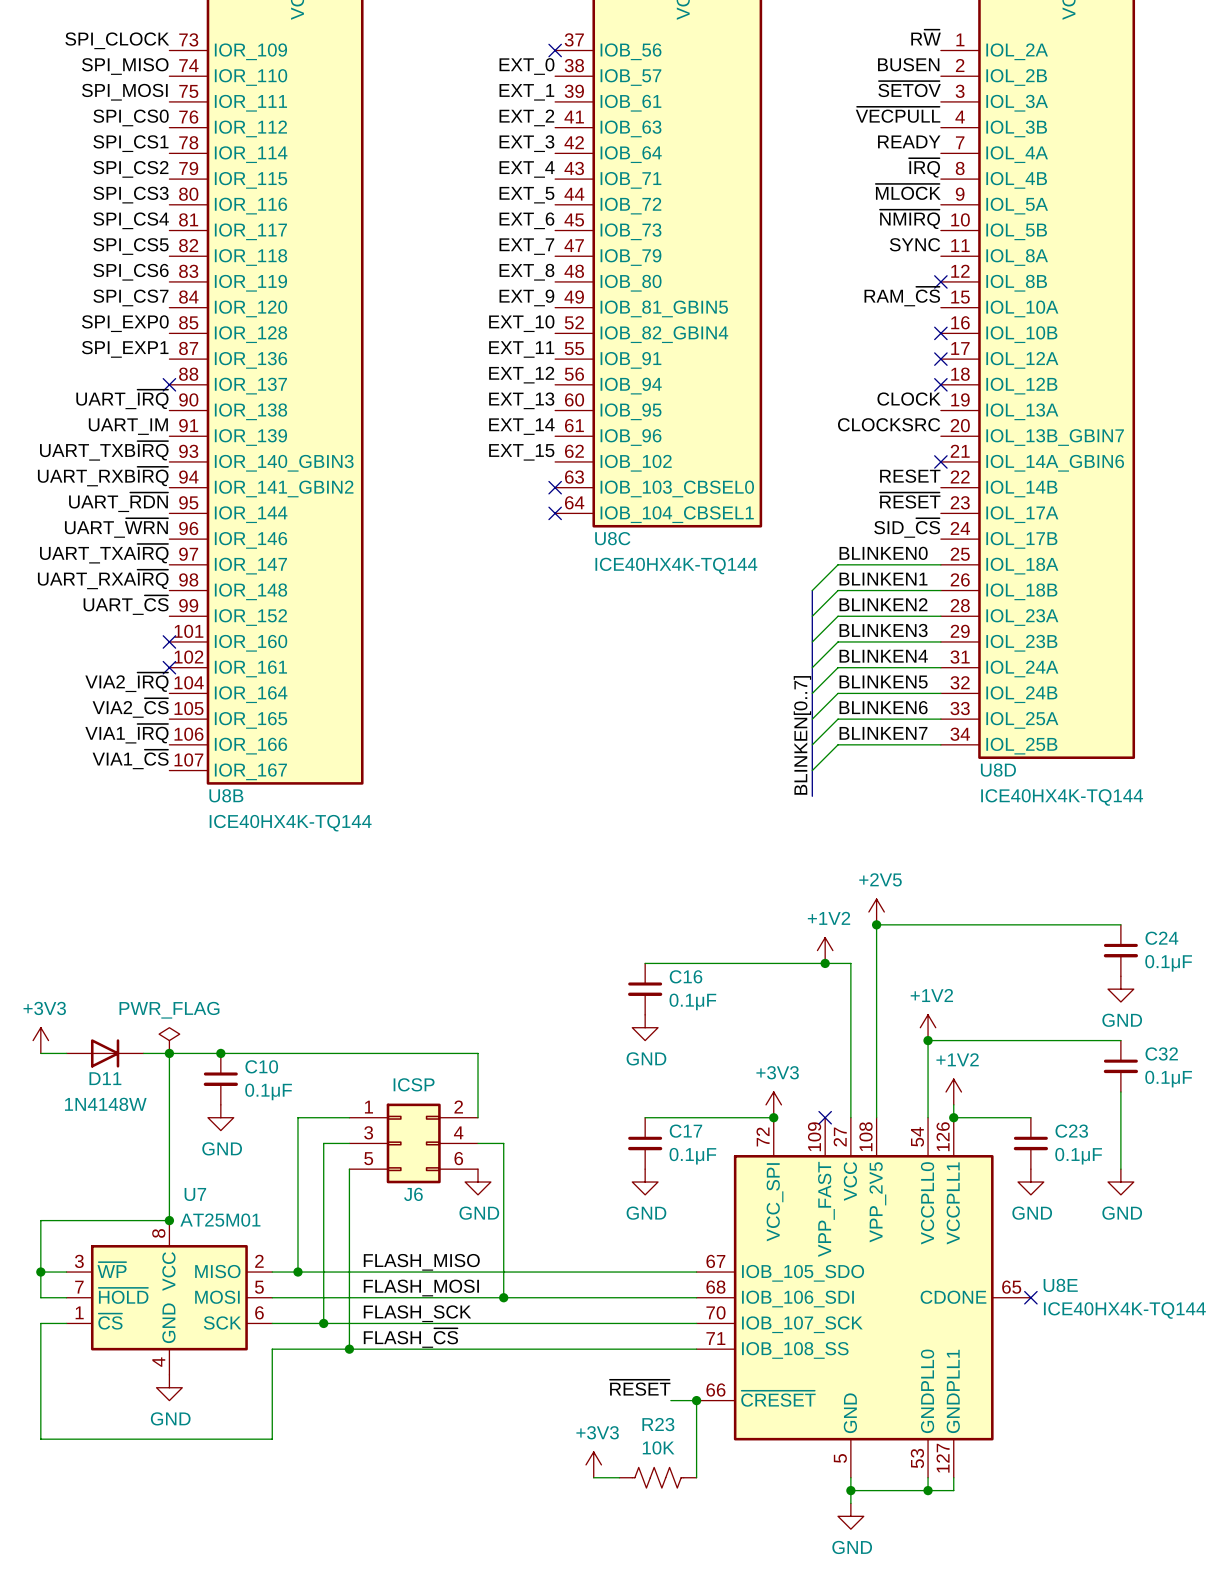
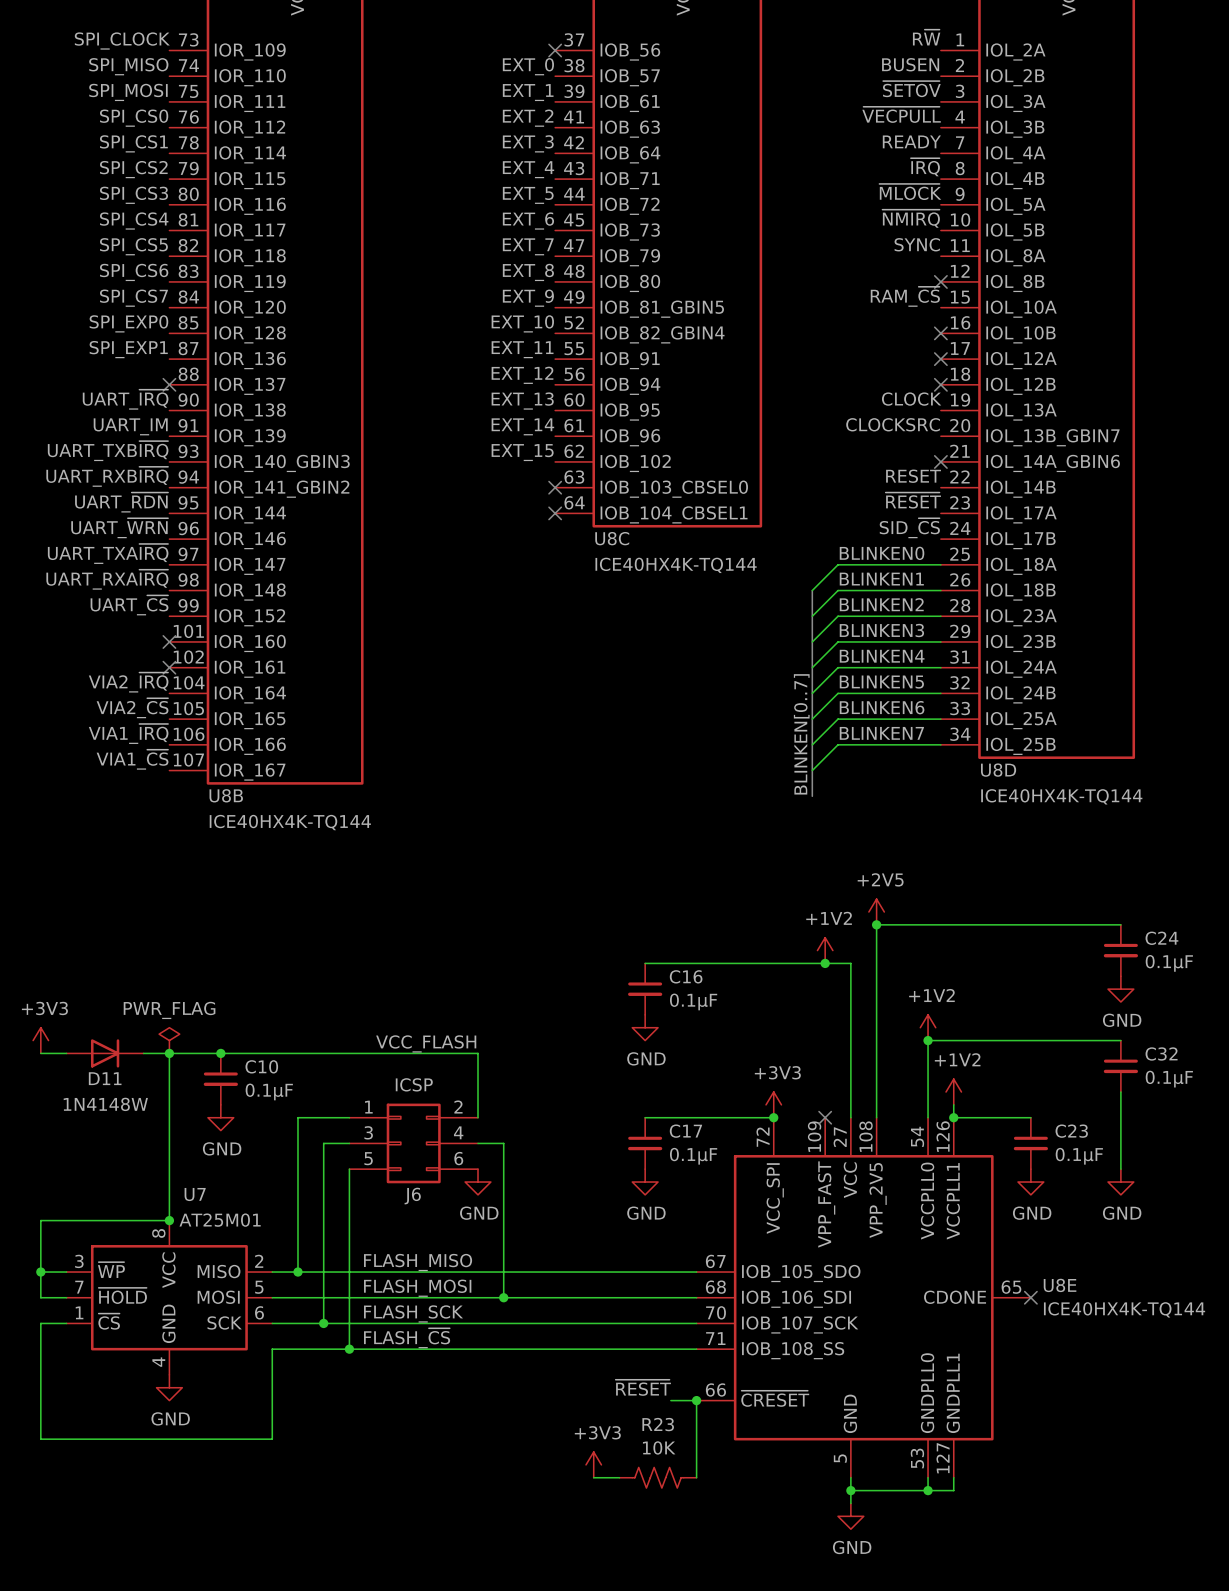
label: none -> VCC_FLASH (426, 1043)

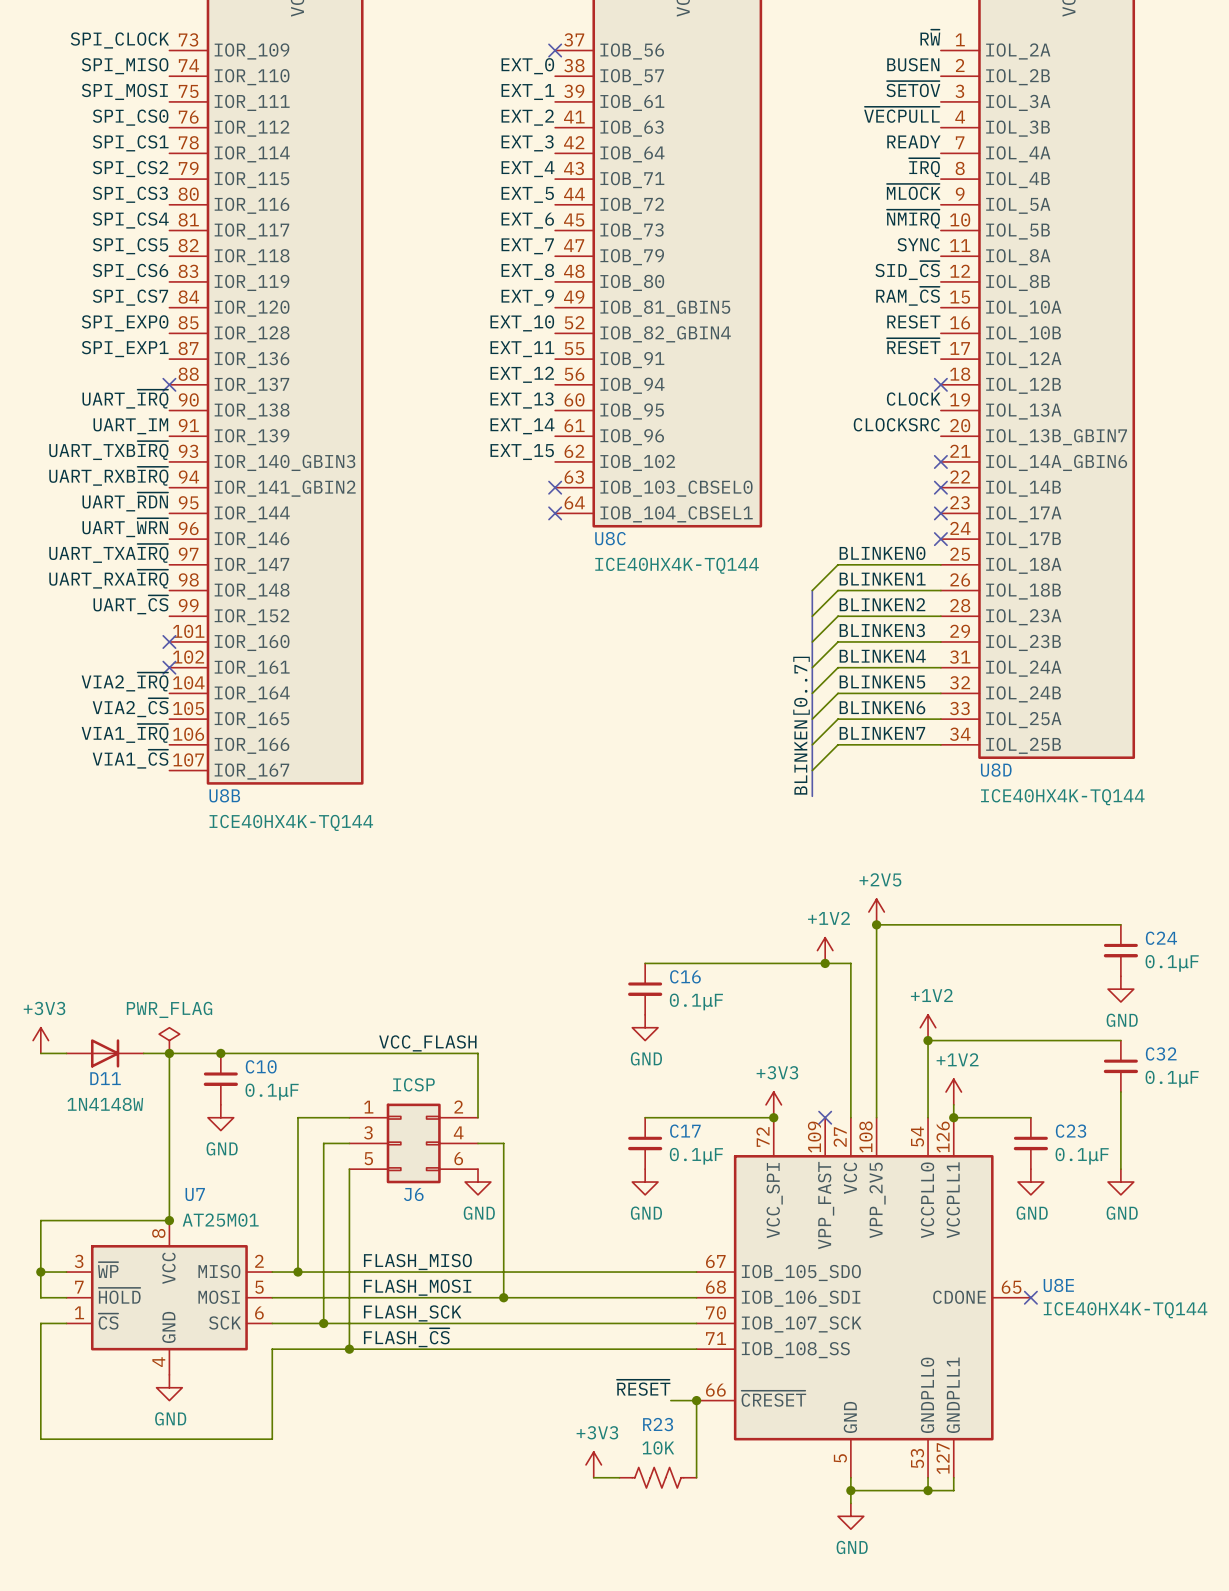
label: none -> SID_~{CS} (907, 270)
no-connect mark: (940, 281) -> none
no-connect mark: (940, 333) -> none
no-connect mark: (940, 359) -> none
label position: RESET (913, 476) -> RESET (913, 321)
no-connect mark: none -> (940, 487)
label position: ~{RESET} (913, 500) -> ~{RESET} (913, 346)
no-connect mark: none -> (940, 513)
label: SID_~{CS} (909, 528) -> none
no-connect mark: none -> (940, 539)

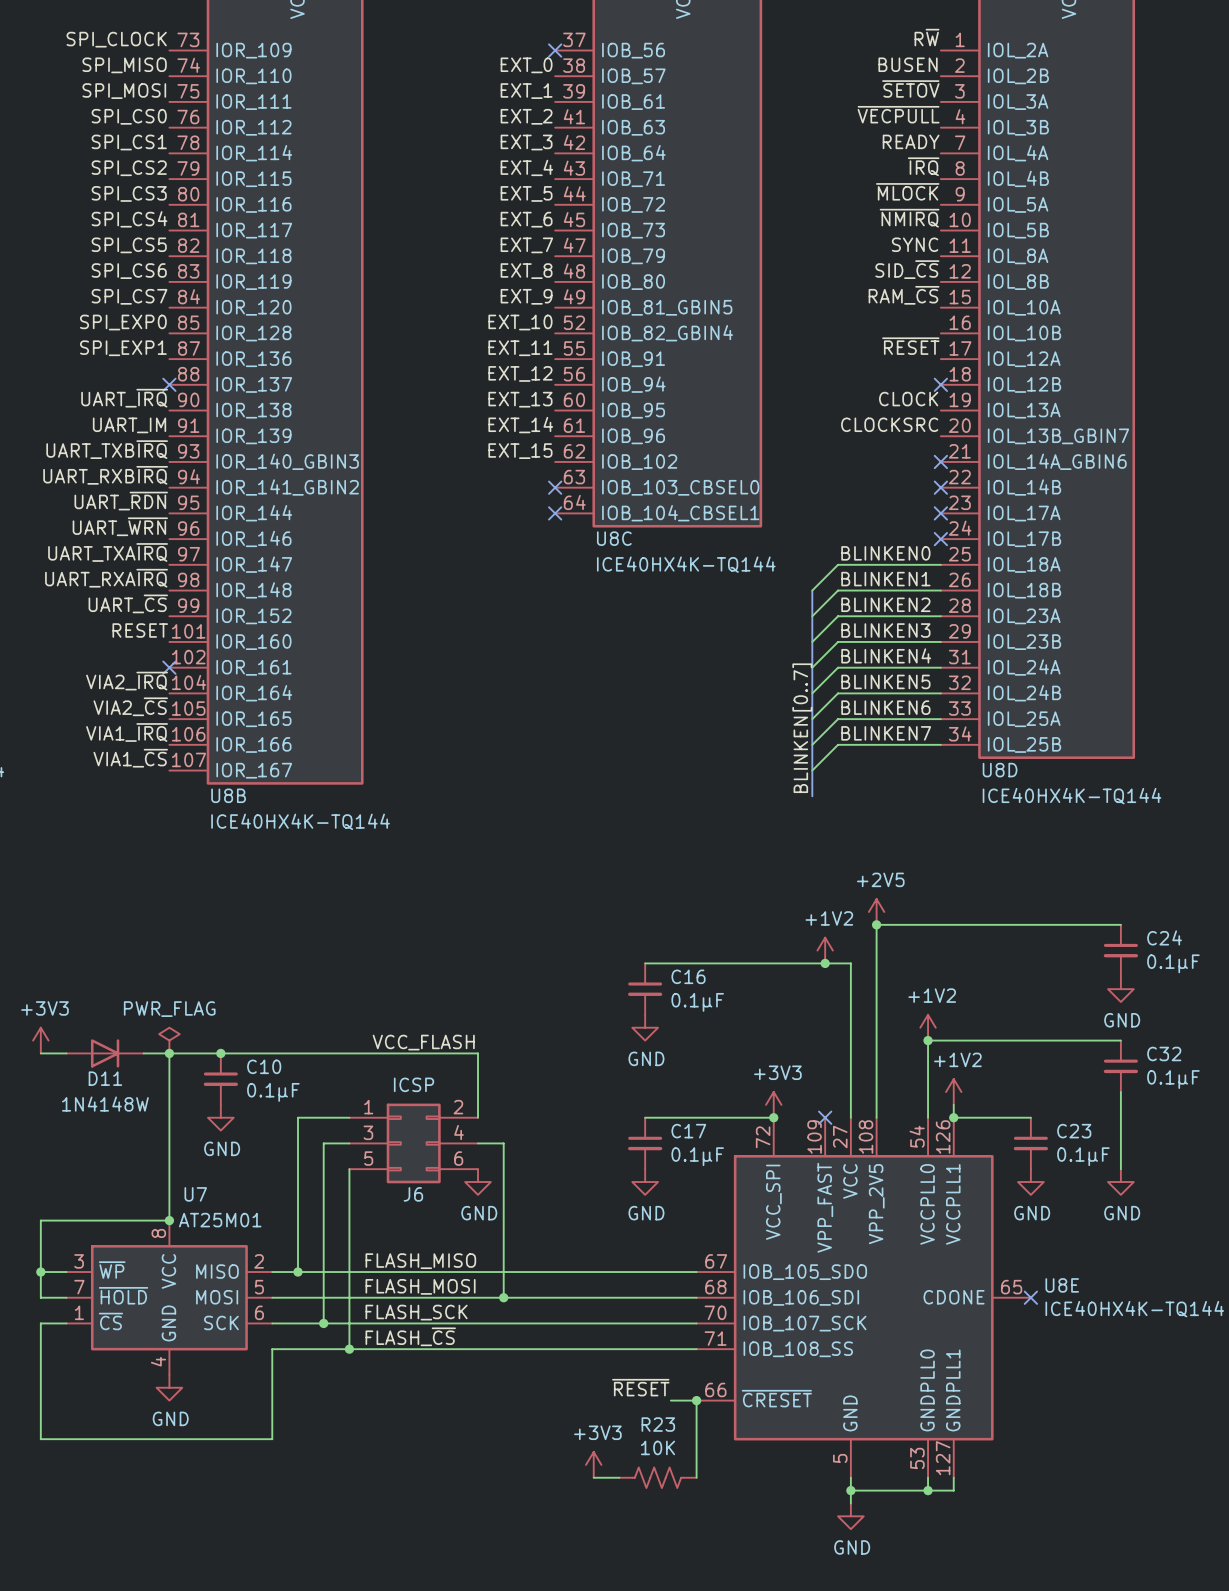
label: RESET (913, 321) -> none
label: none -> RESET (140, 630)
no-connect mark: (169, 641) -> none

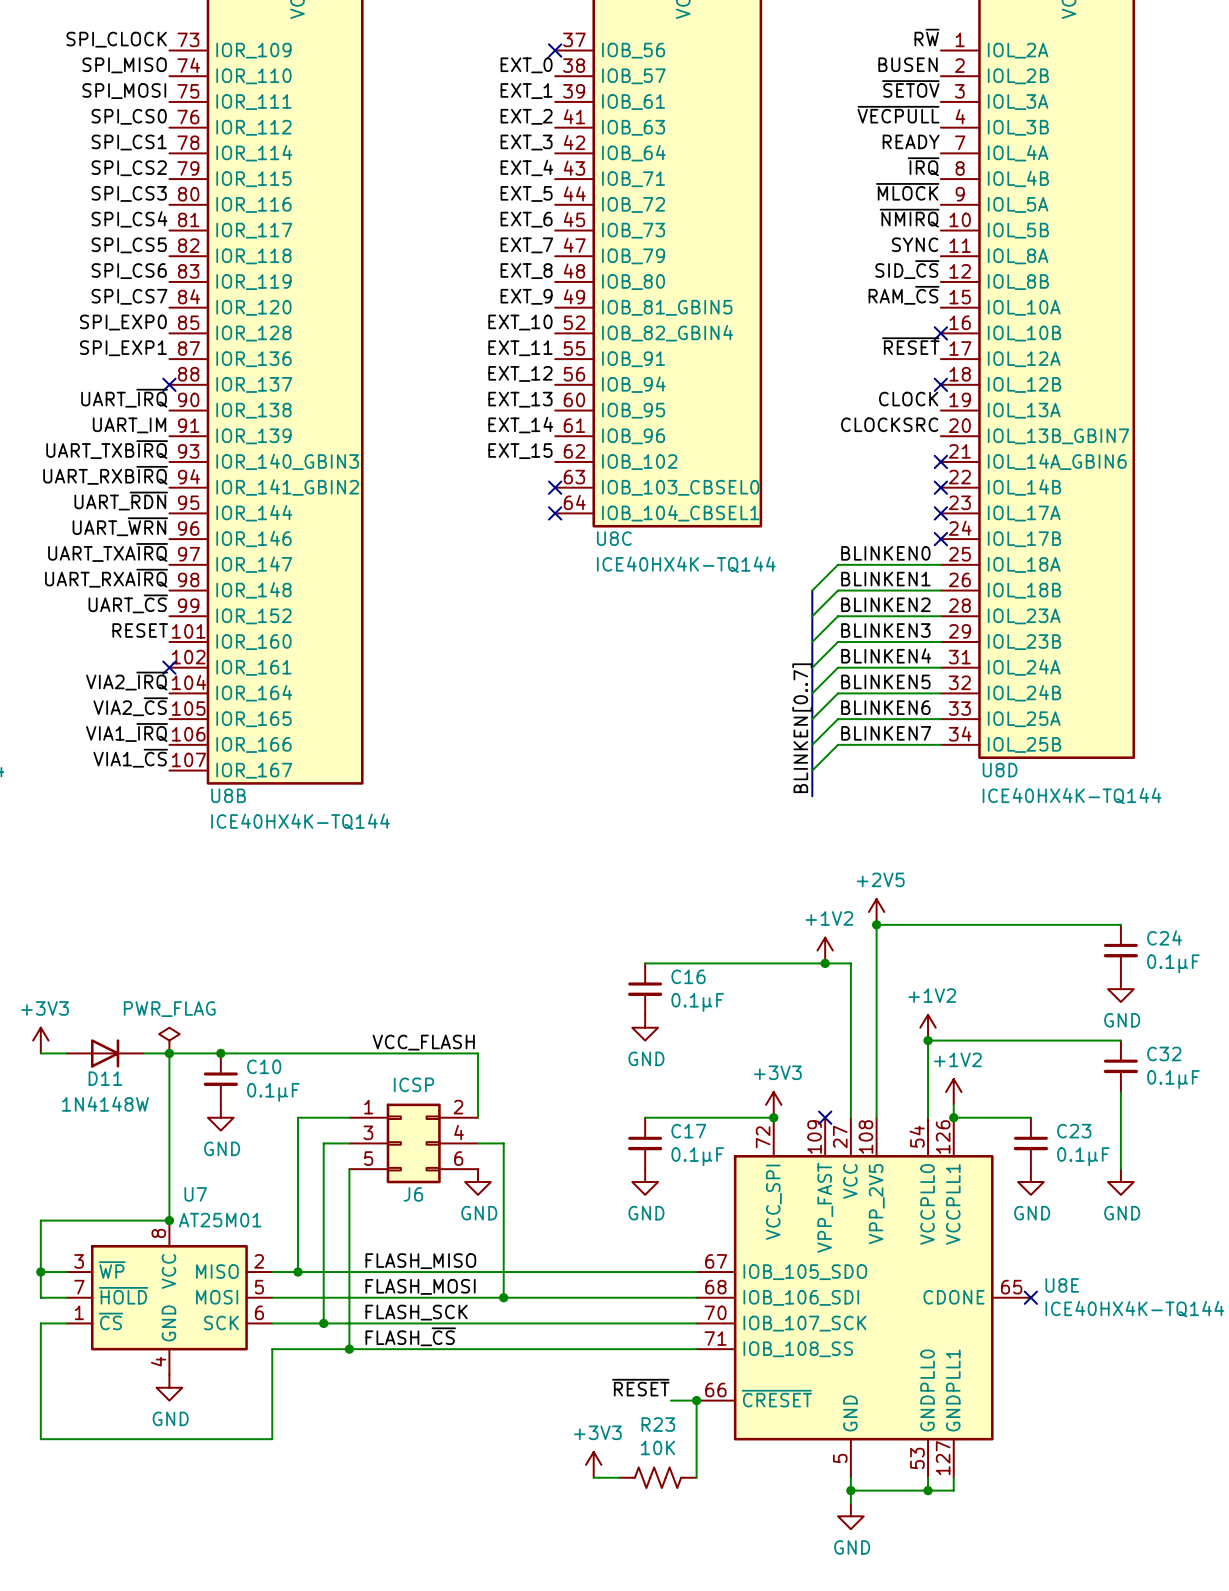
no-connect mark: none -> (940, 333)

